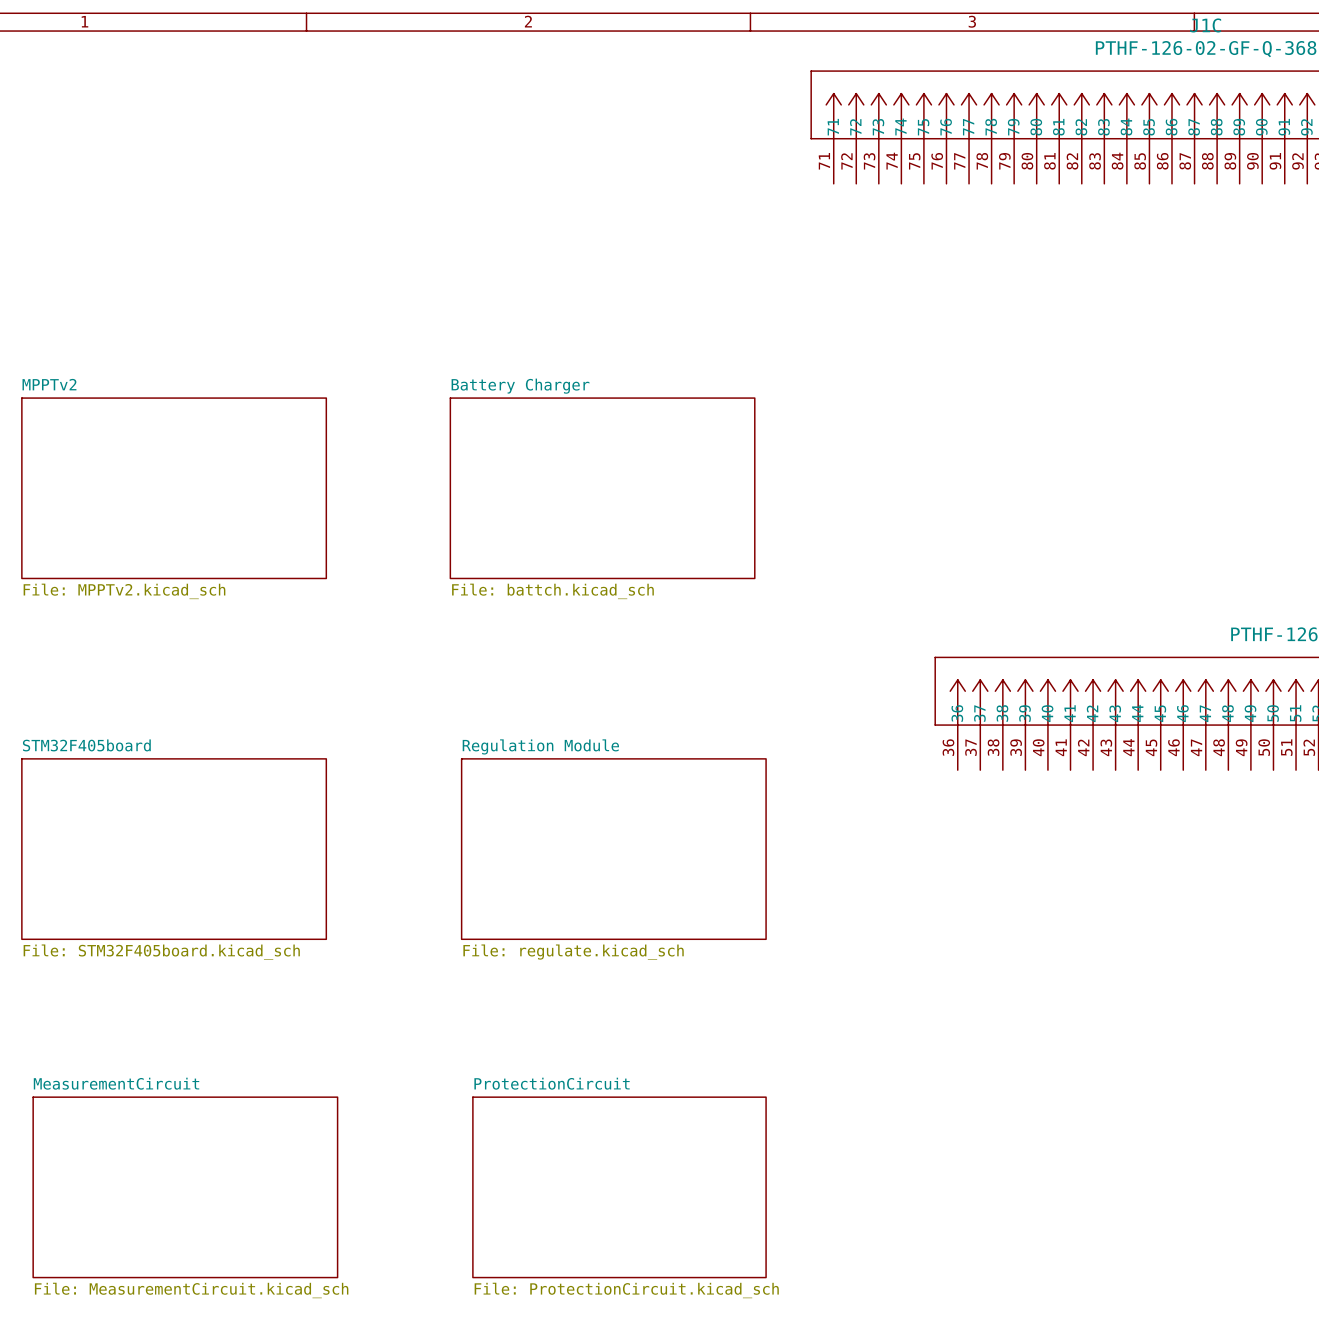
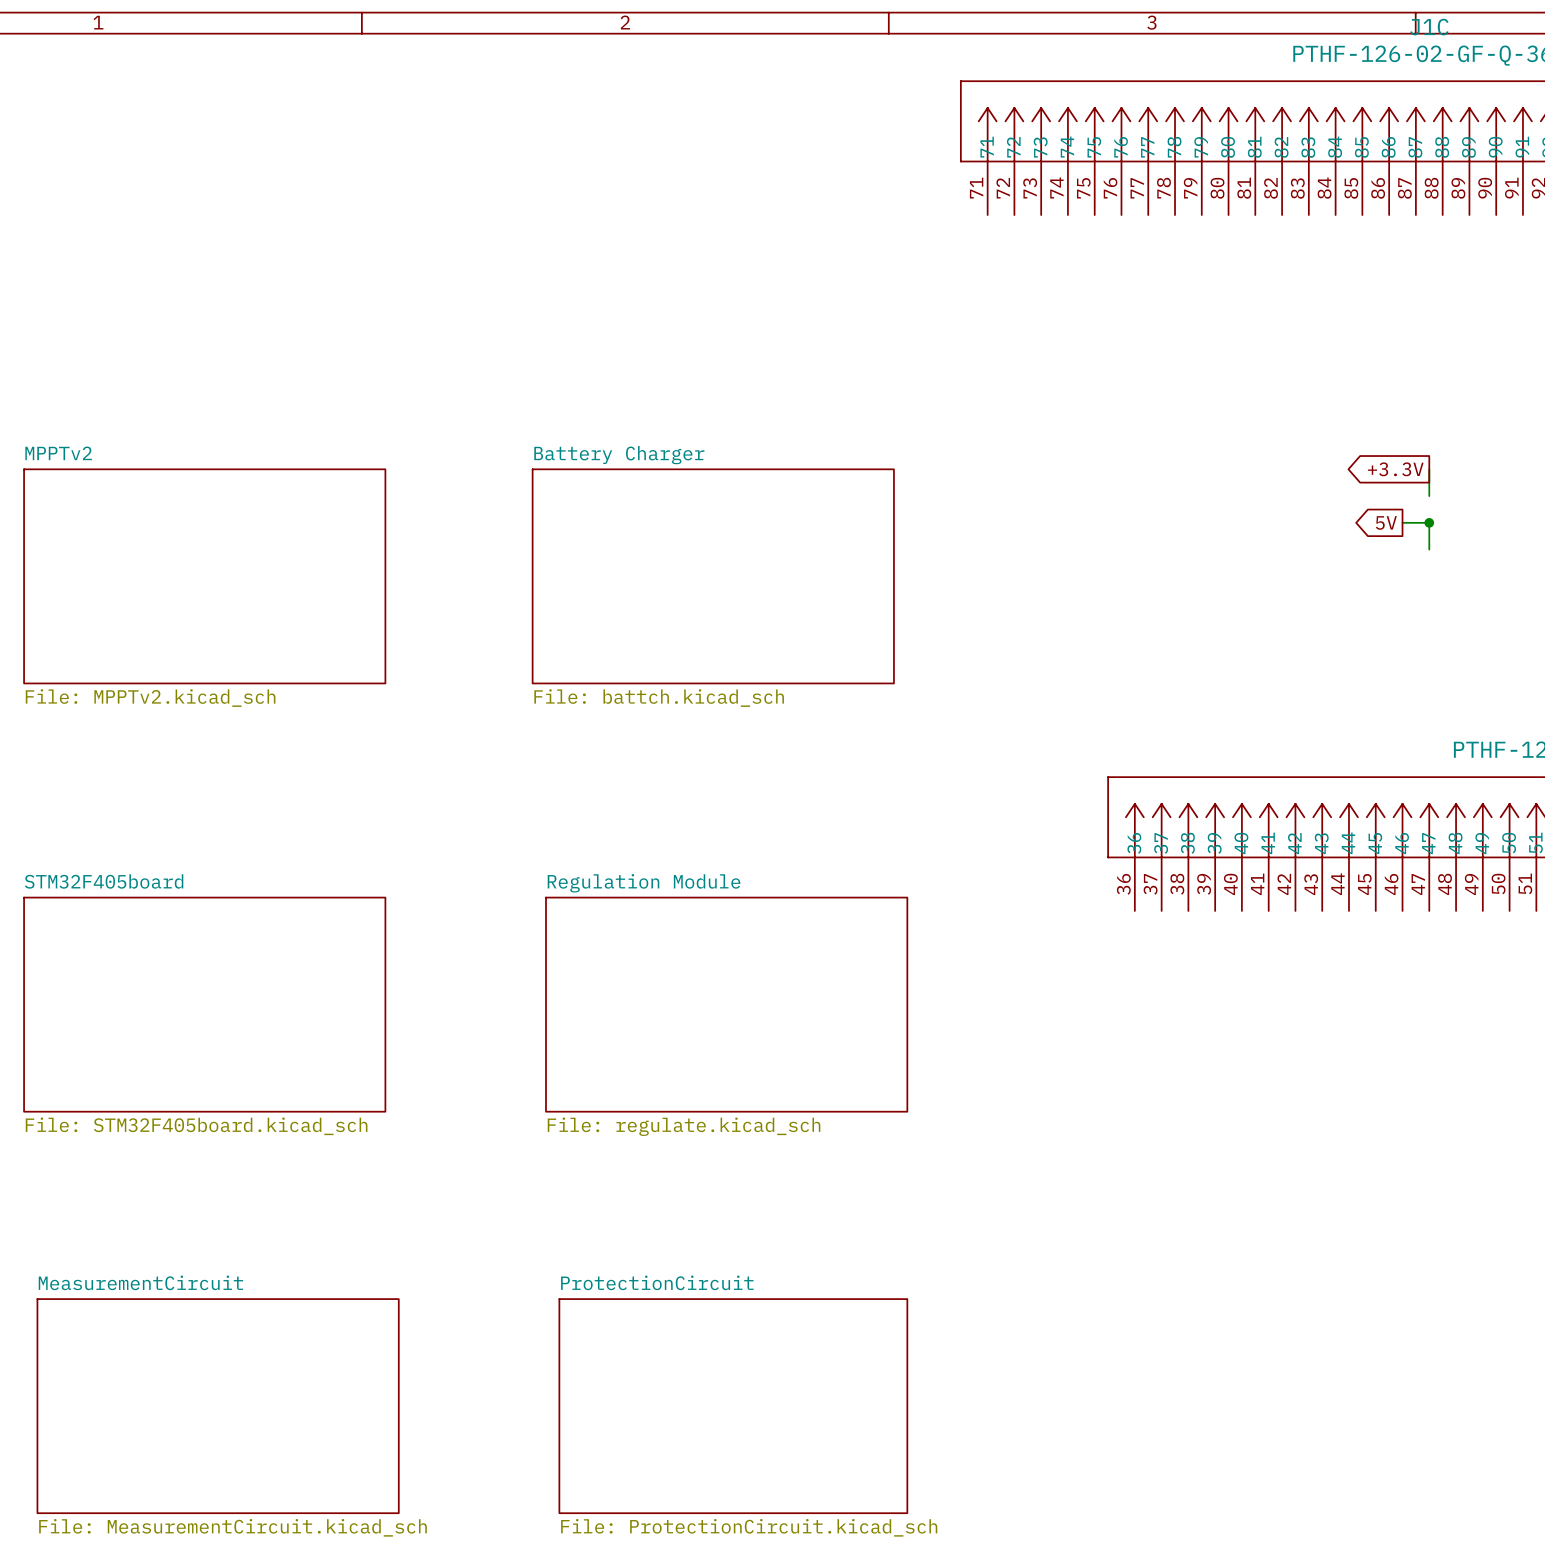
global label: none -> +3.3V (1395, 469)
wire: none -> (1429, 469) (1429, 496)
global label: none -> 5V (1386, 522)
wire: none -> (1402, 522) (1429, 522) (1429, 549)
junction: none -> (1429, 522)

